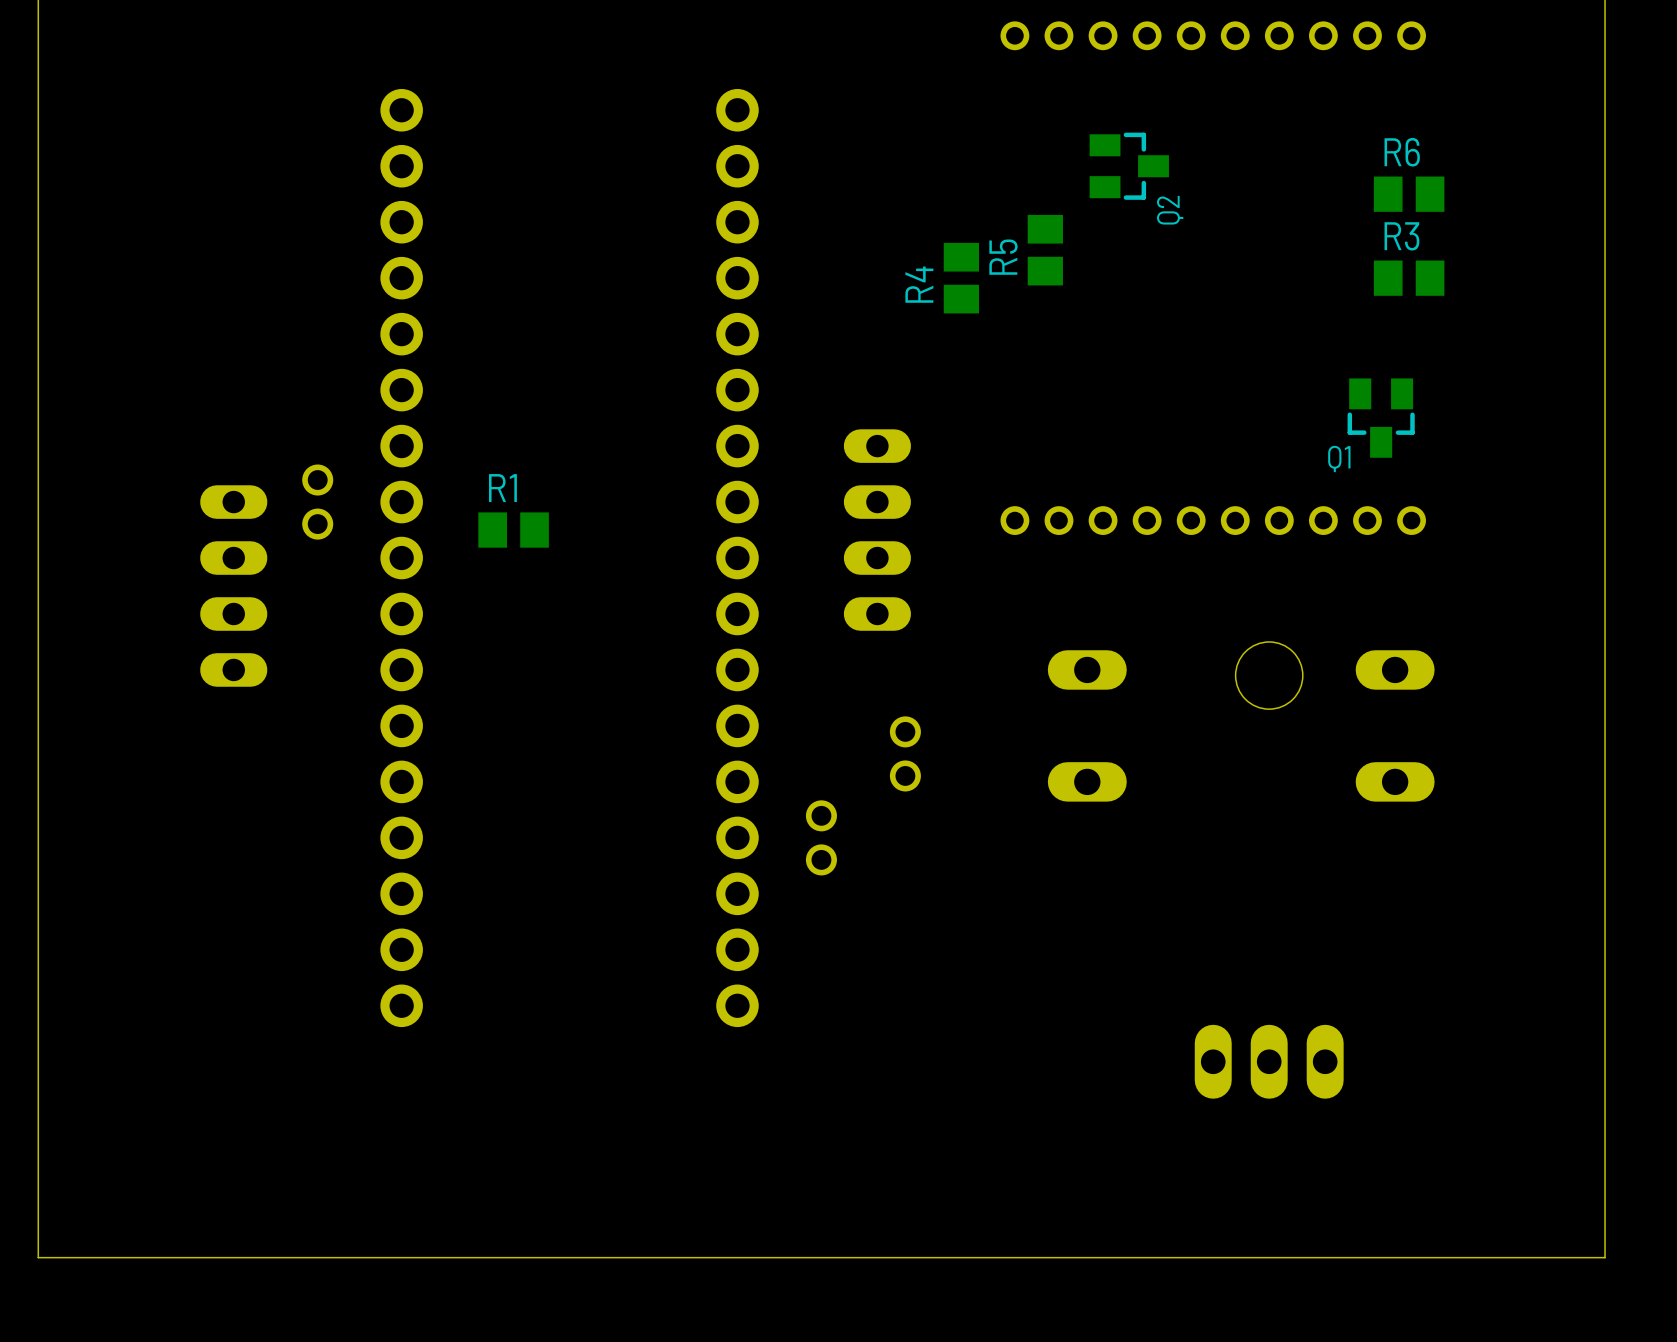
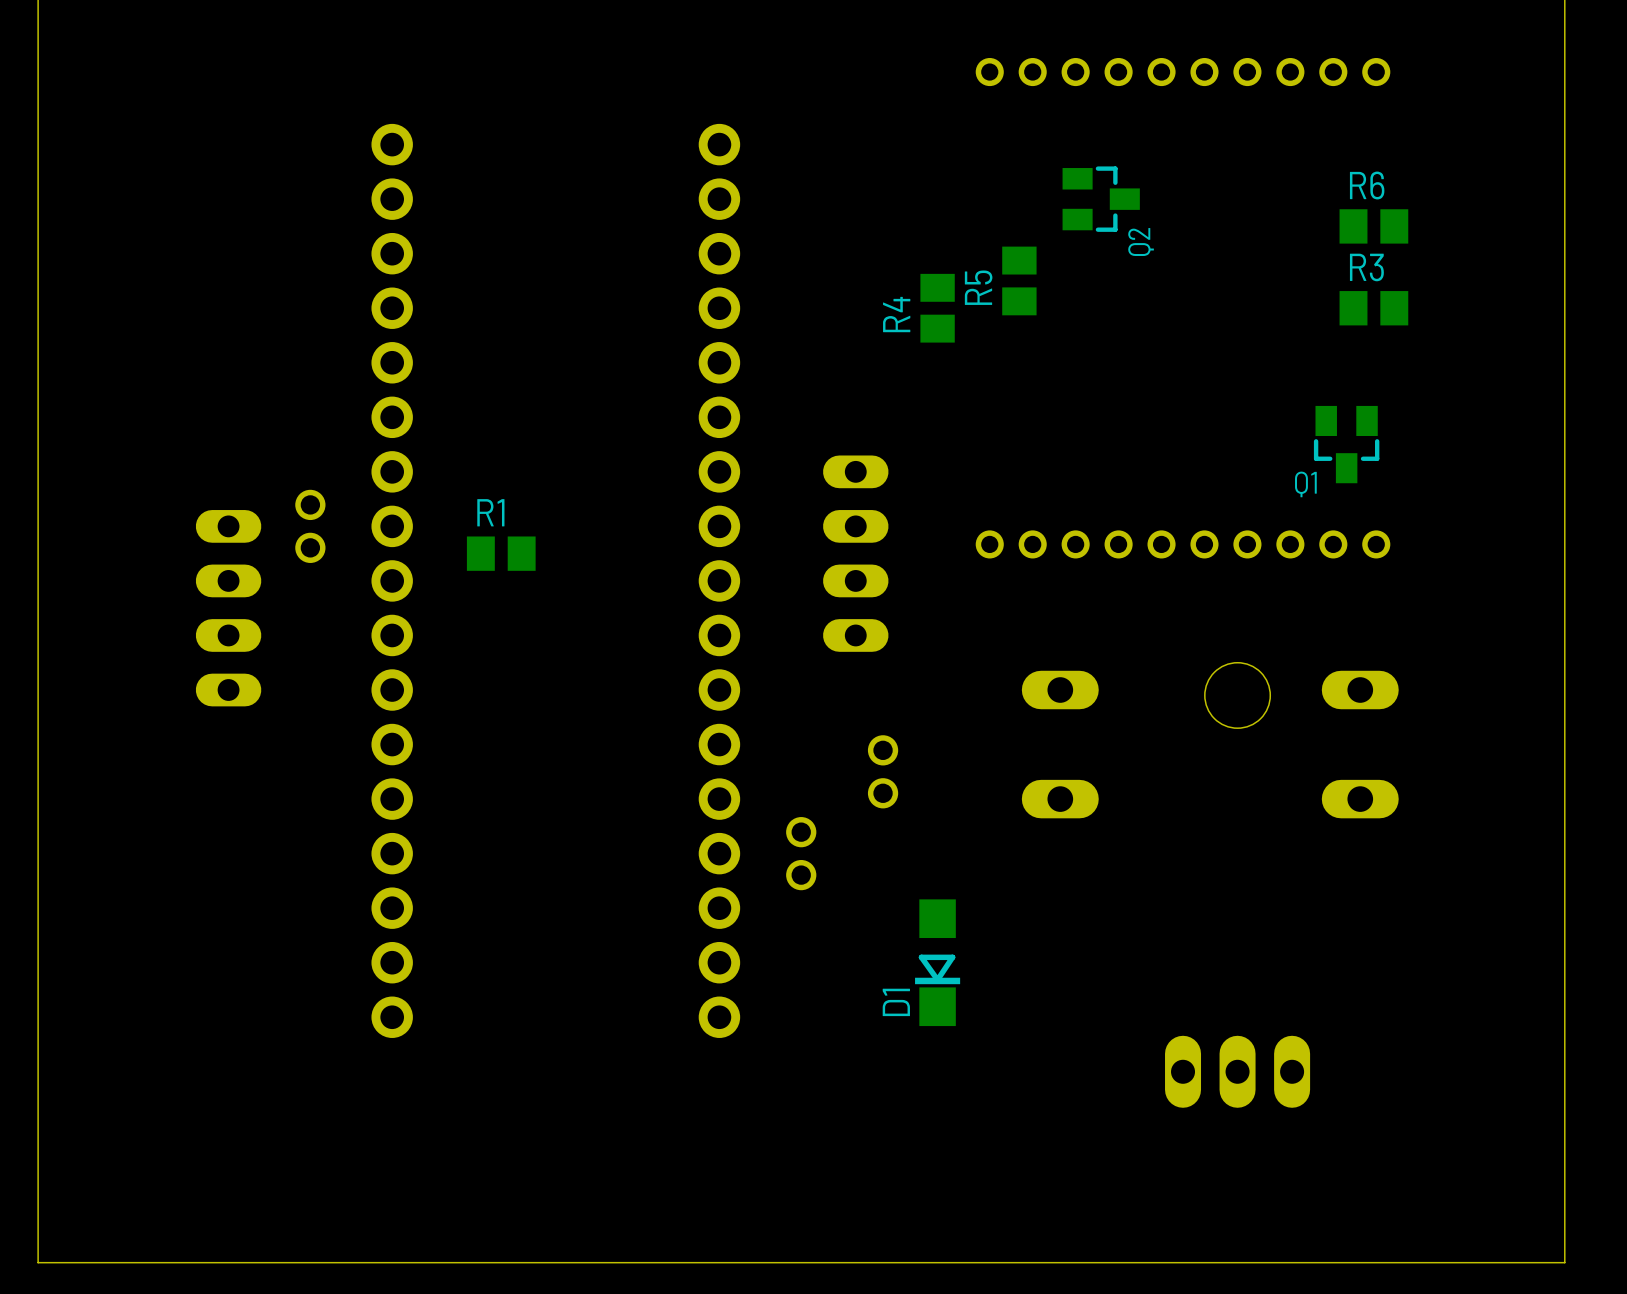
D1: none -> (937, 962)

